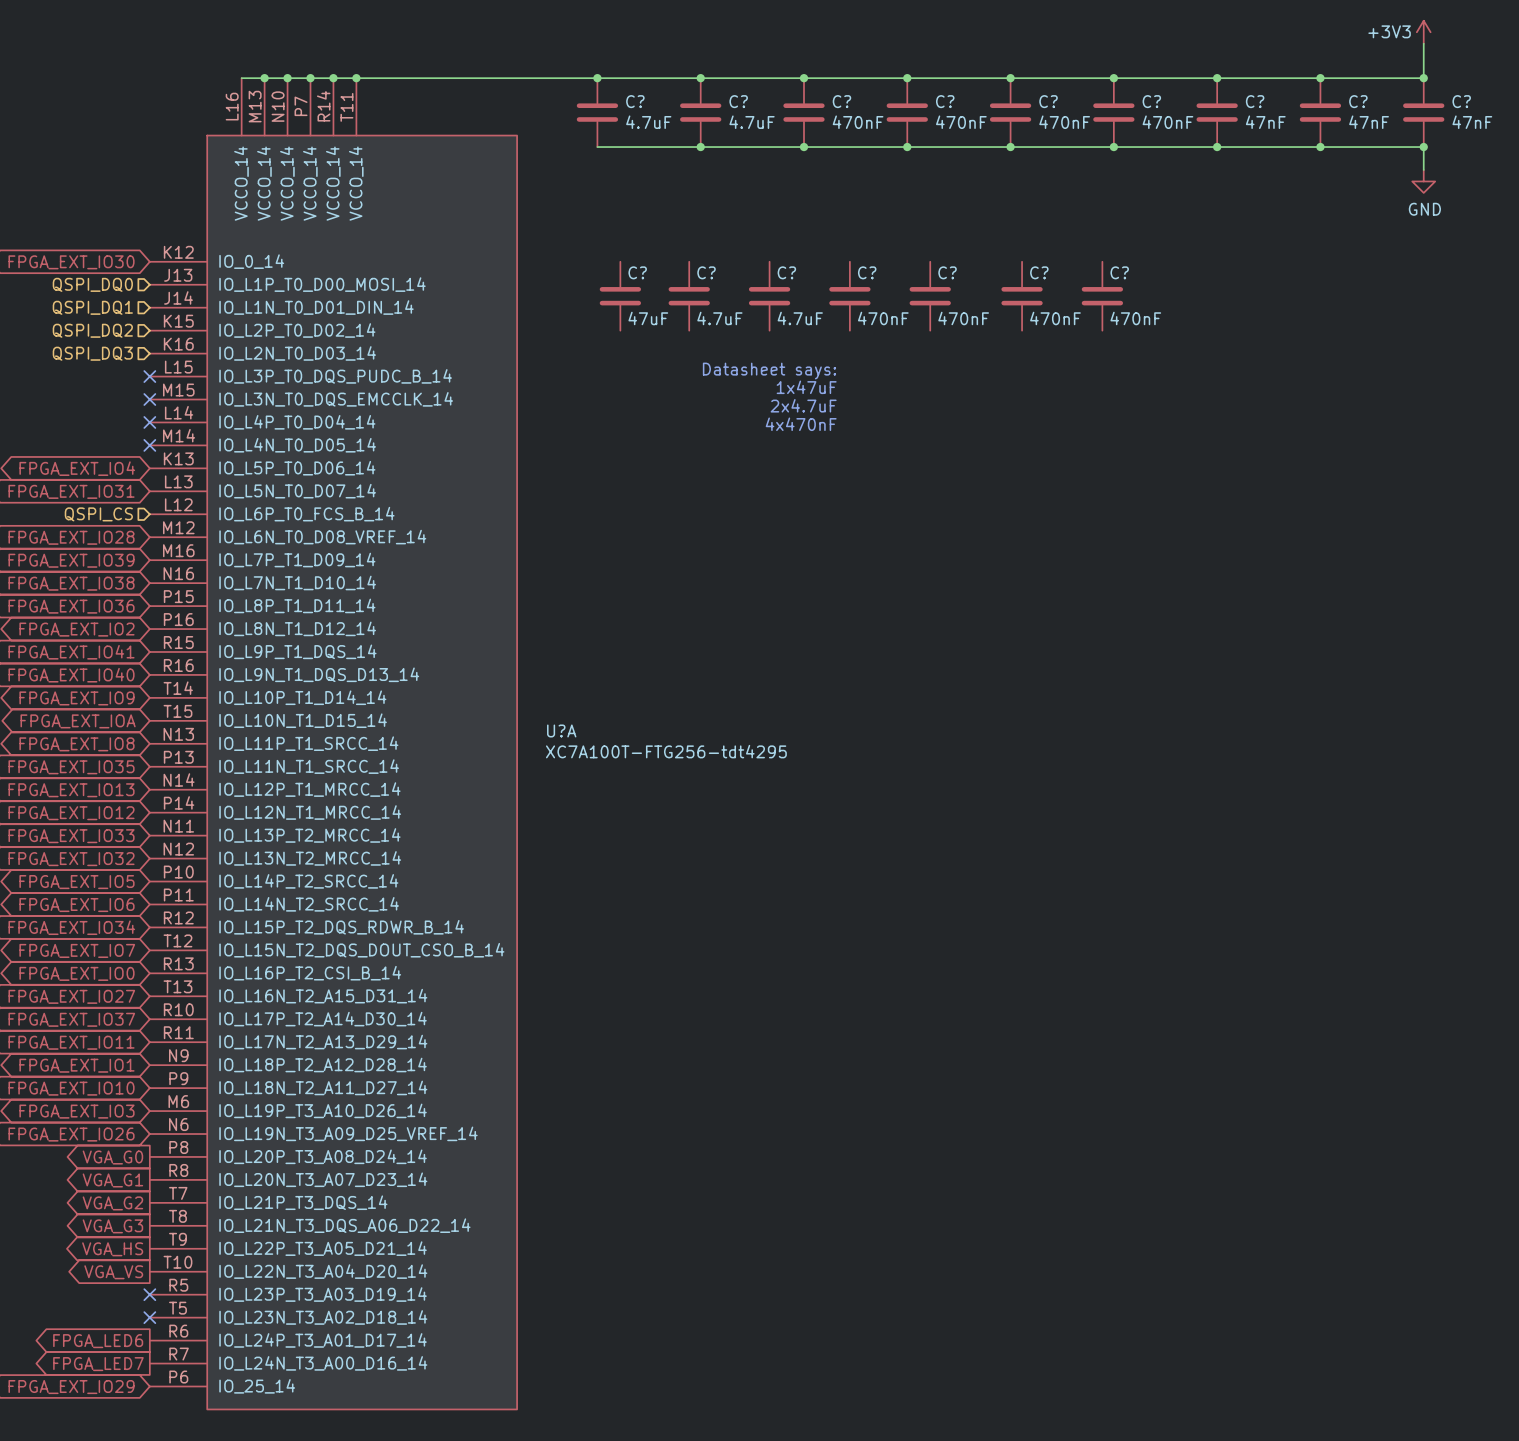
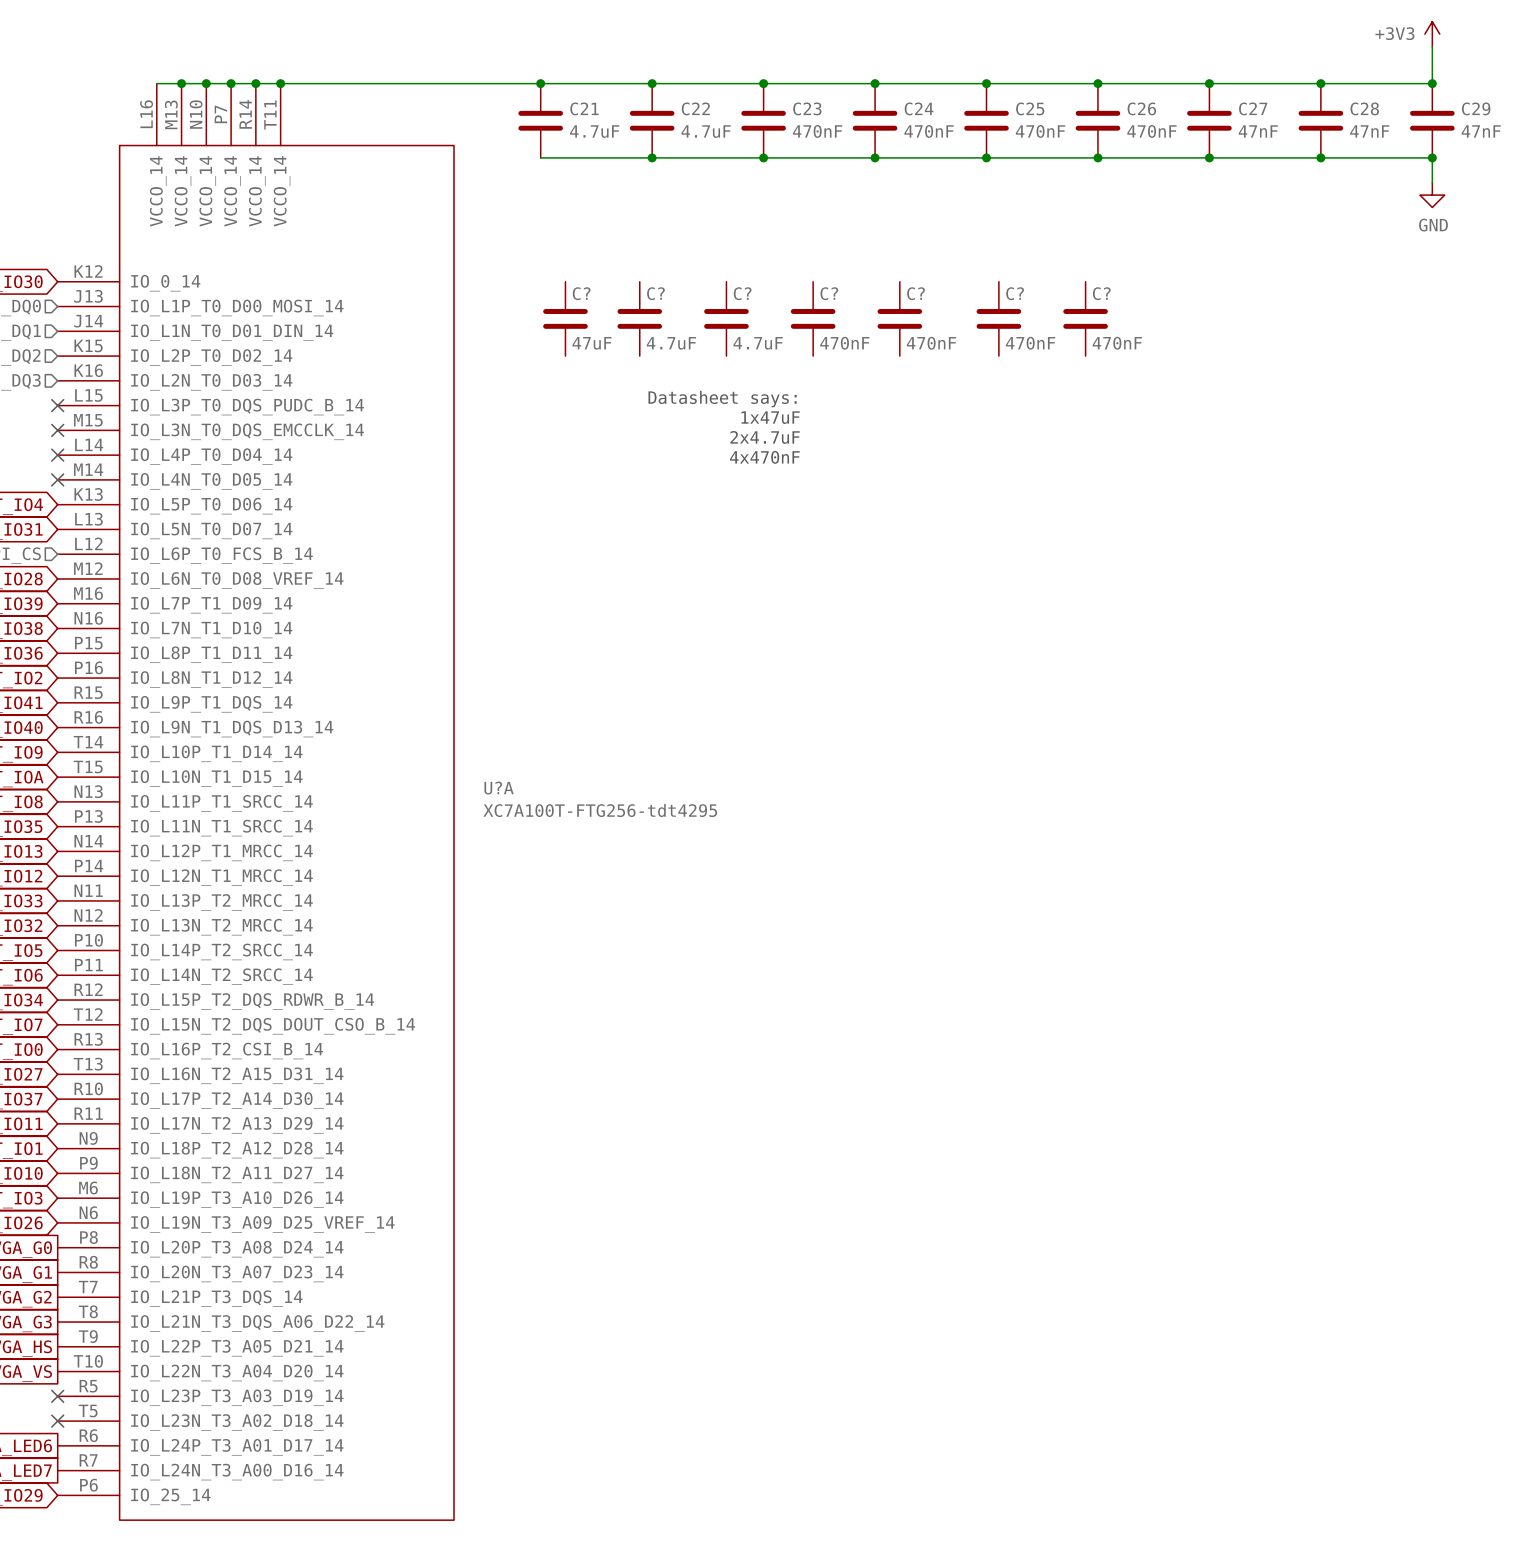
C? name: C? (635, 101) -> C21 (584, 108)
C? name: C? (738, 101) -> C22 (695, 108)
C? name: C? (841, 101) -> C23 (807, 108)
C? name: C? (945, 101) -> C24 (919, 108)
C? name: C? (1048, 101) -> C25 (1030, 108)
C? name: C? (1151, 101) -> C26 (1141, 108)
C? name: C? (1255, 101) -> C27 (1253, 108)
C? name: C? (1358, 101) -> C28 (1364, 108)
C? name: C? (1461, 101) -> C29 (1476, 108)

